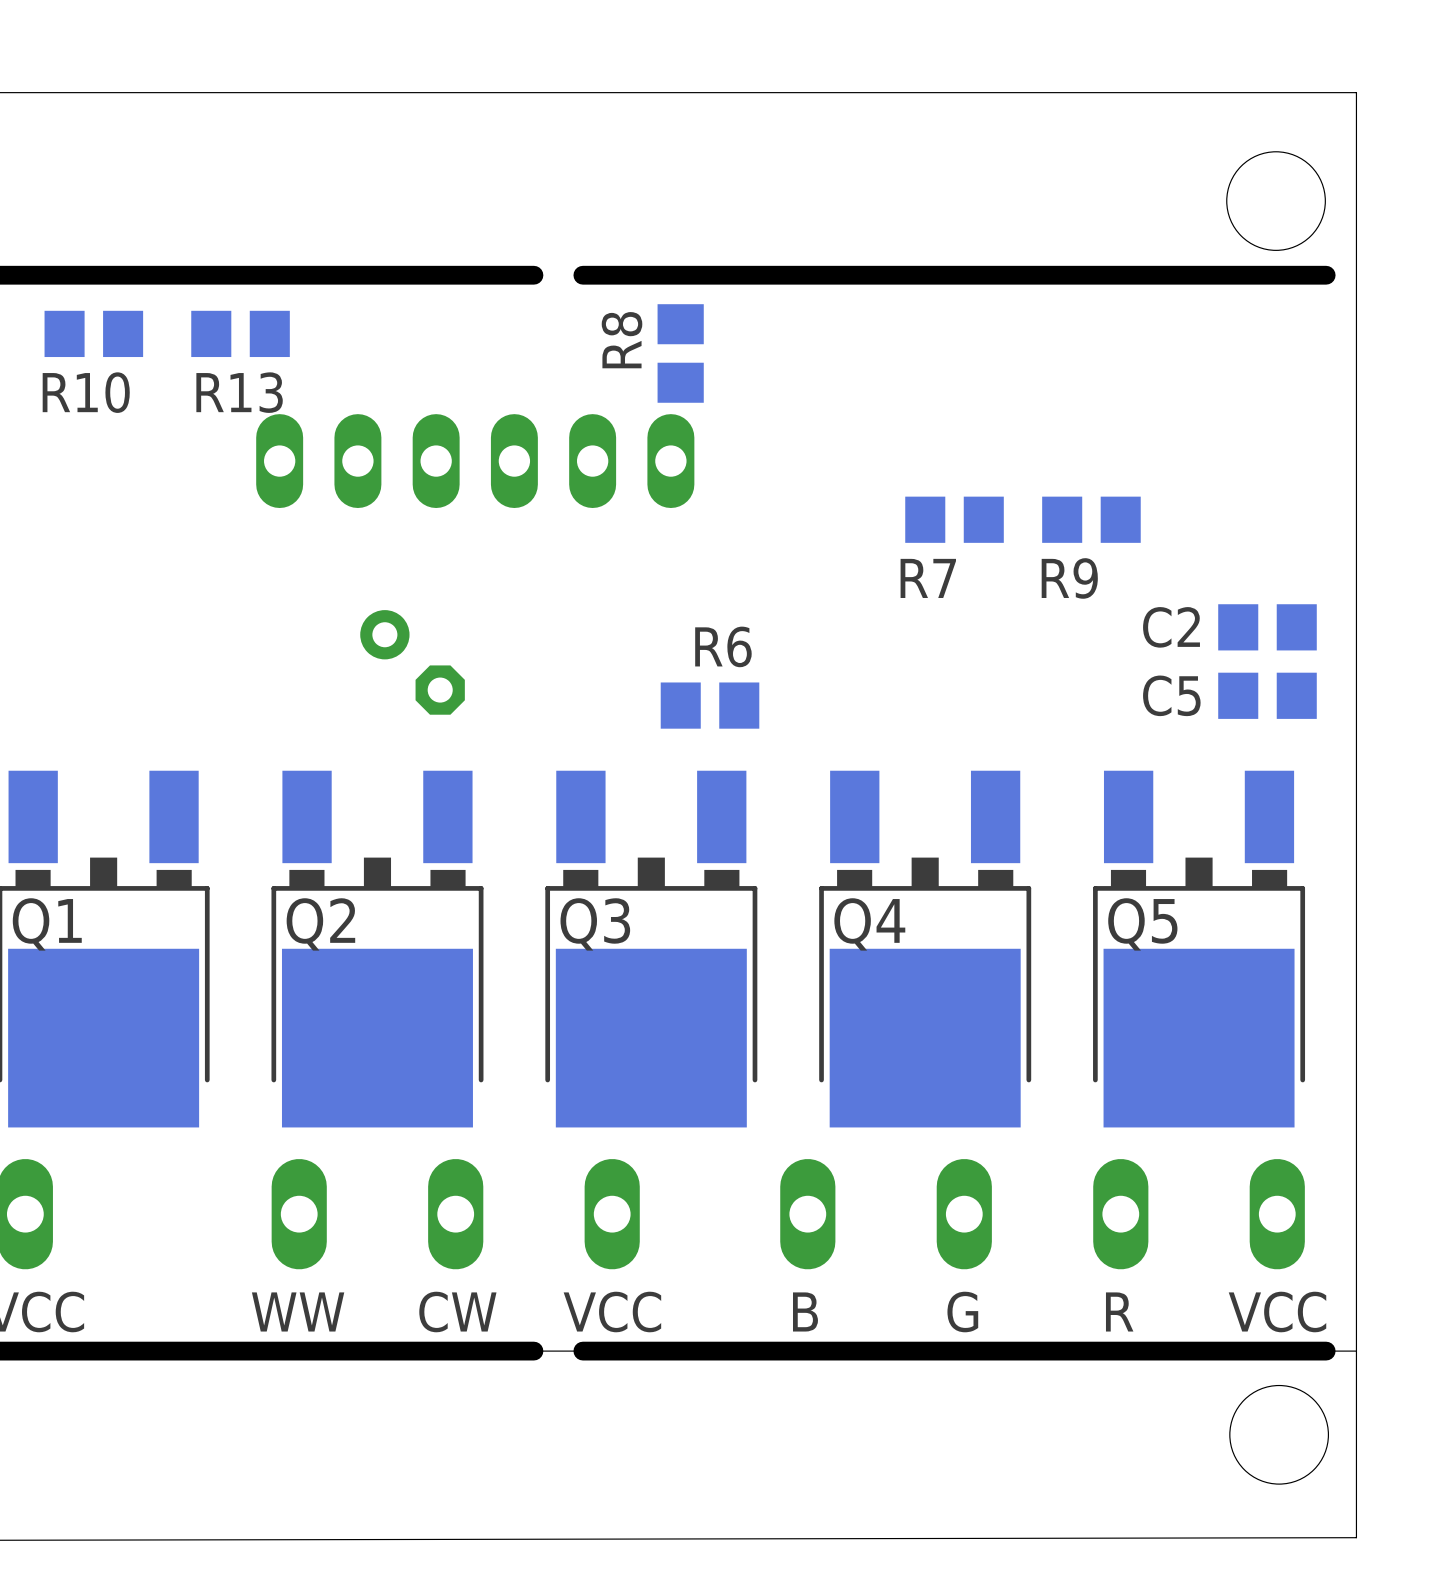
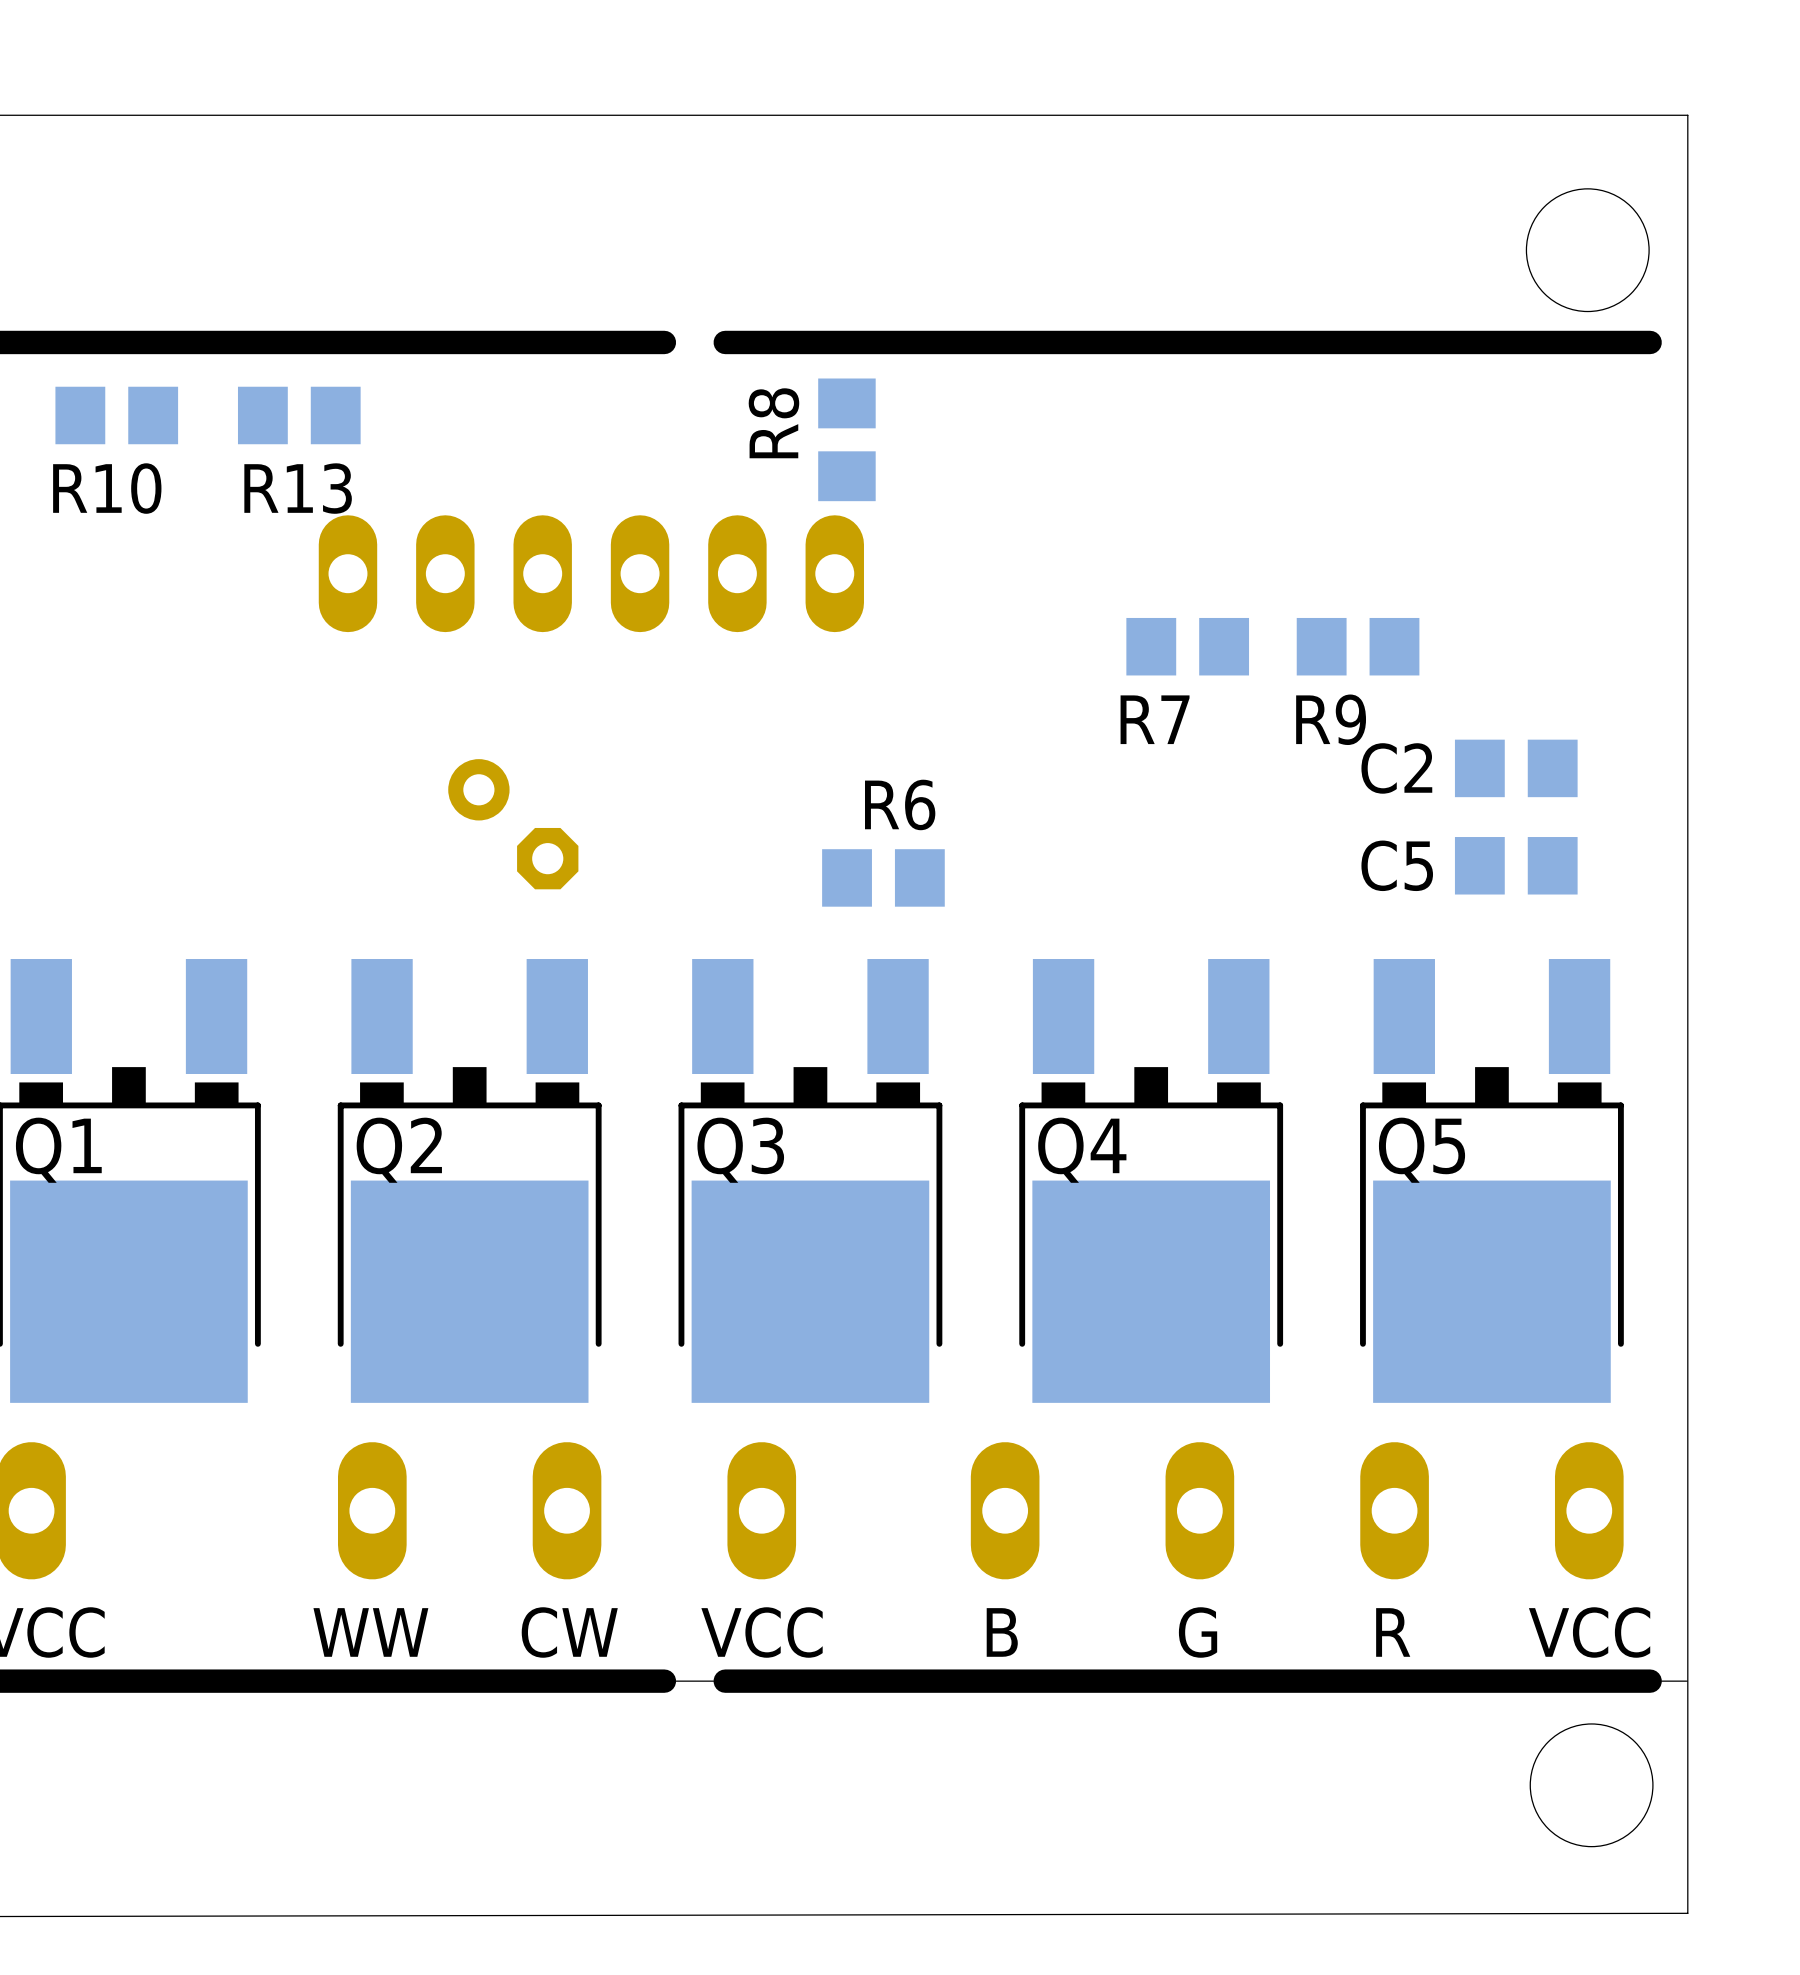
C2 position: (1267, 627) -> (1516, 768)
C5 position: (1267, 695) -> (1516, 865)

